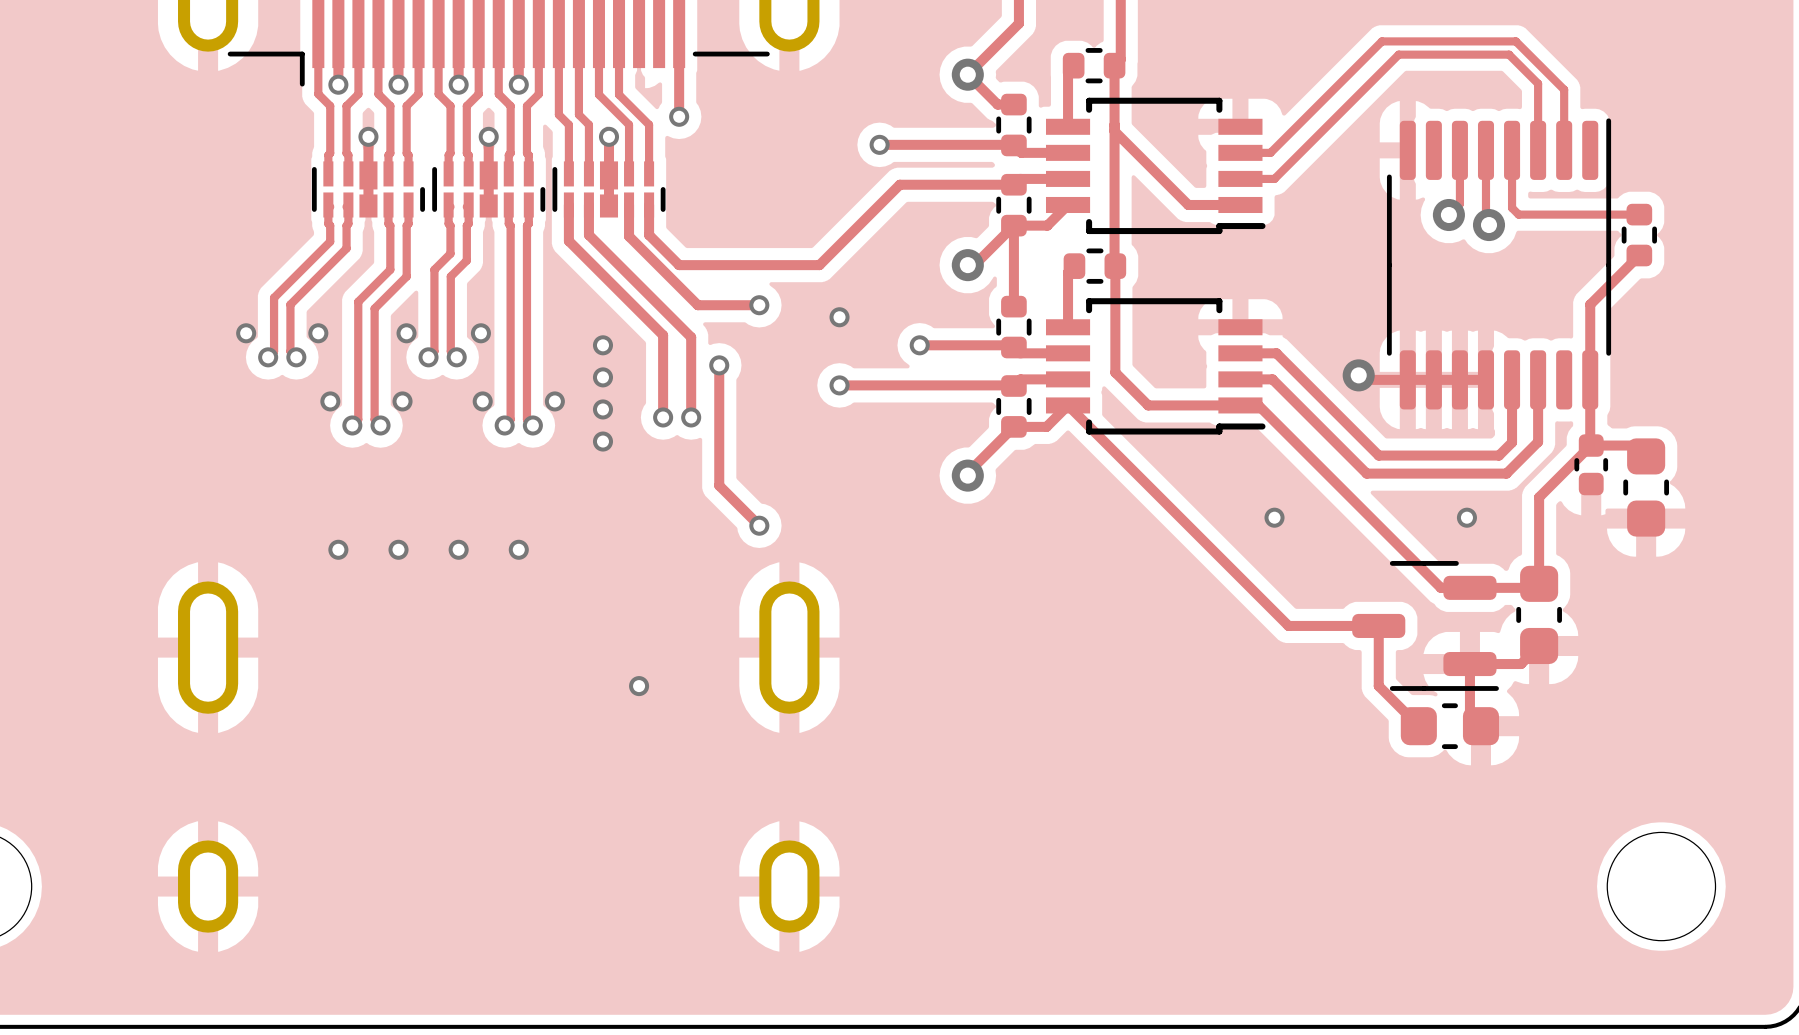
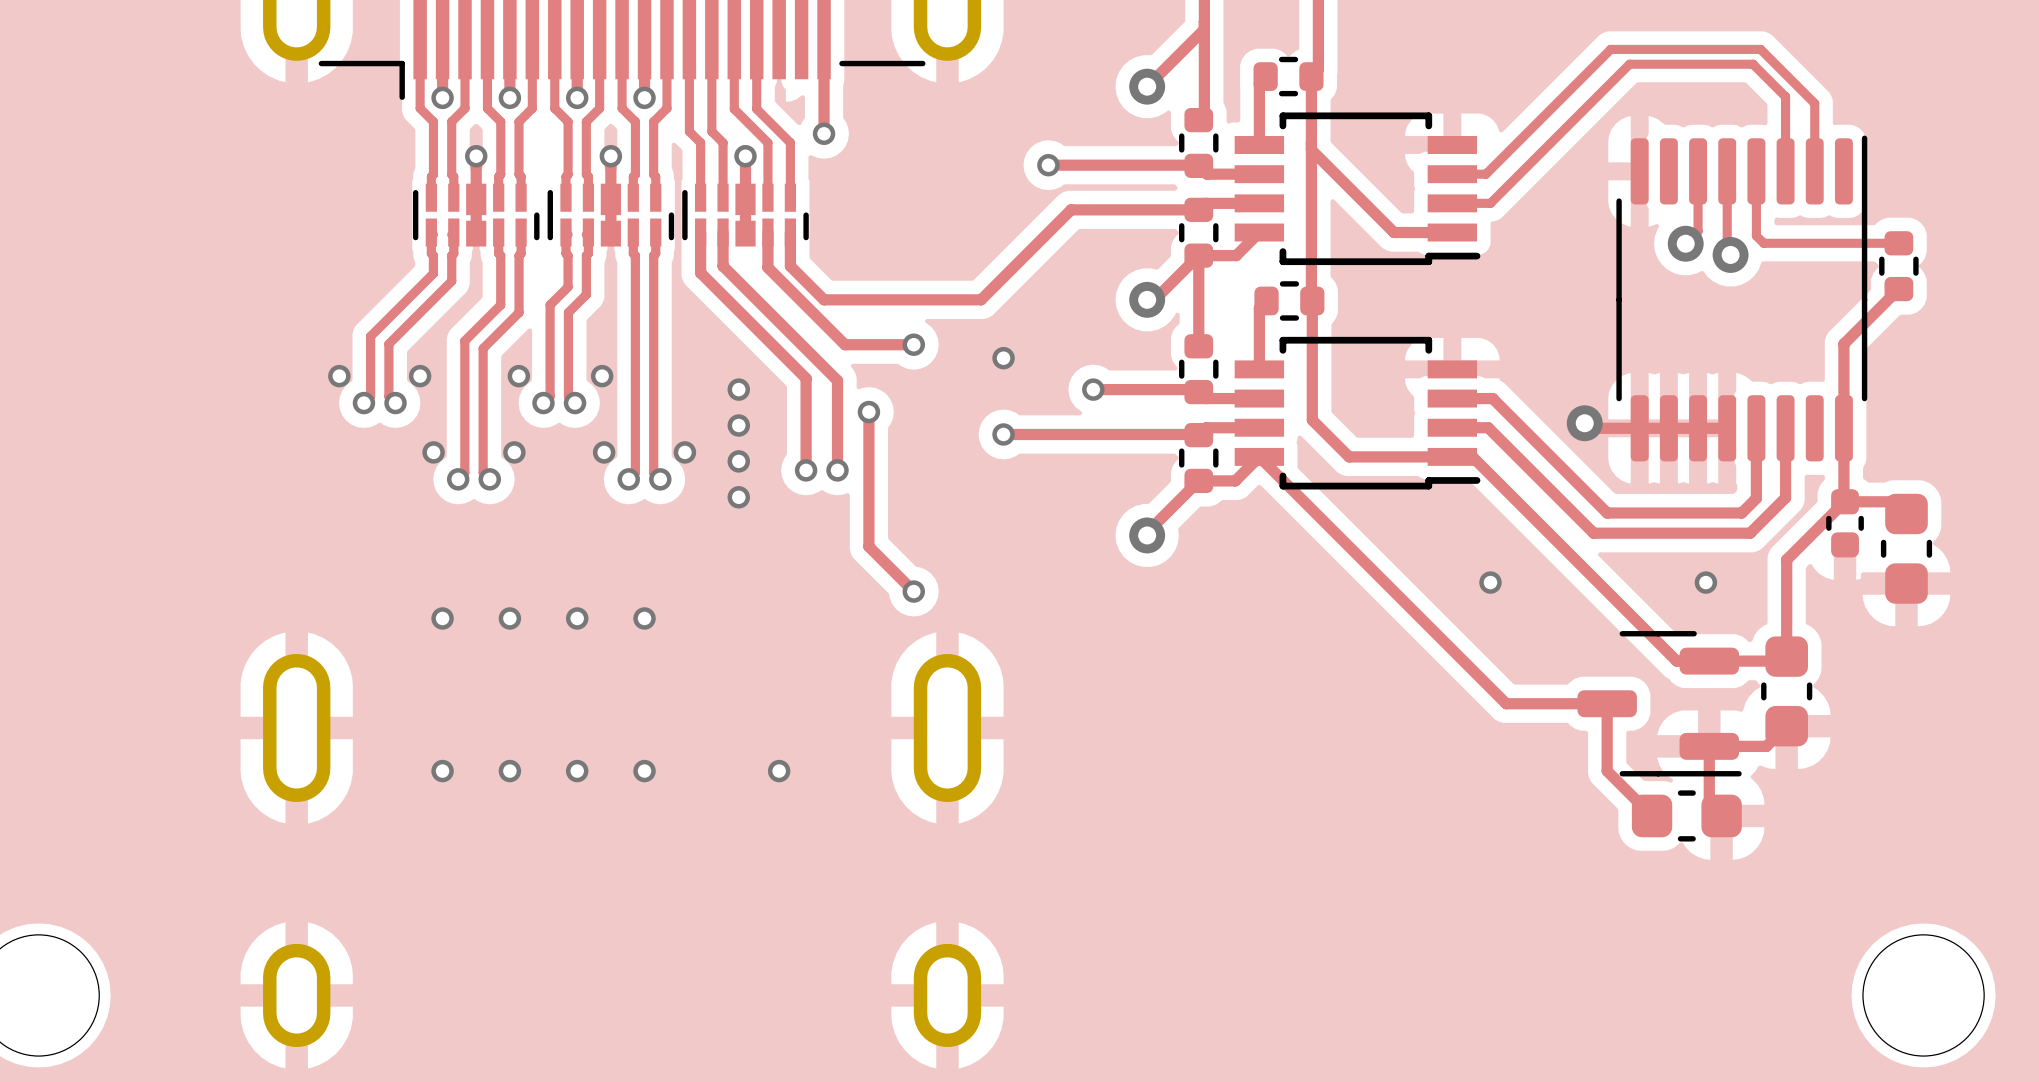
track: (967, 74) (997, 104) (1013, 104) -> (1204, 29) (1204, 114) (1198, 120)
via: none -> (442, 771)
via: none -> (509, 771)
via: none -> (577, 771)
via: none -> (644, 771)

